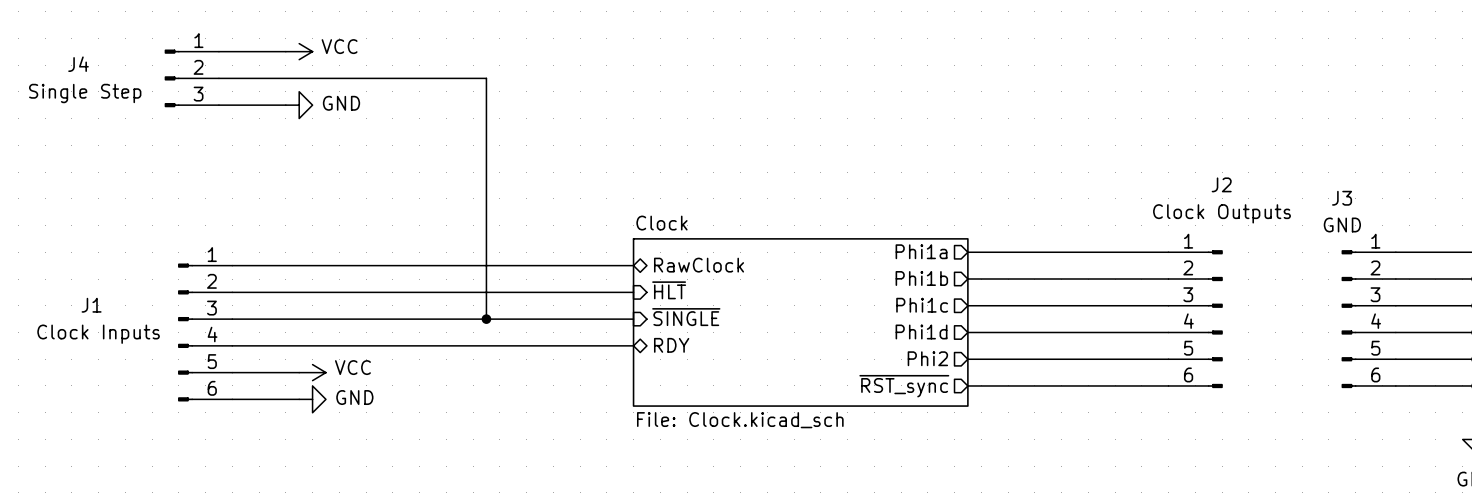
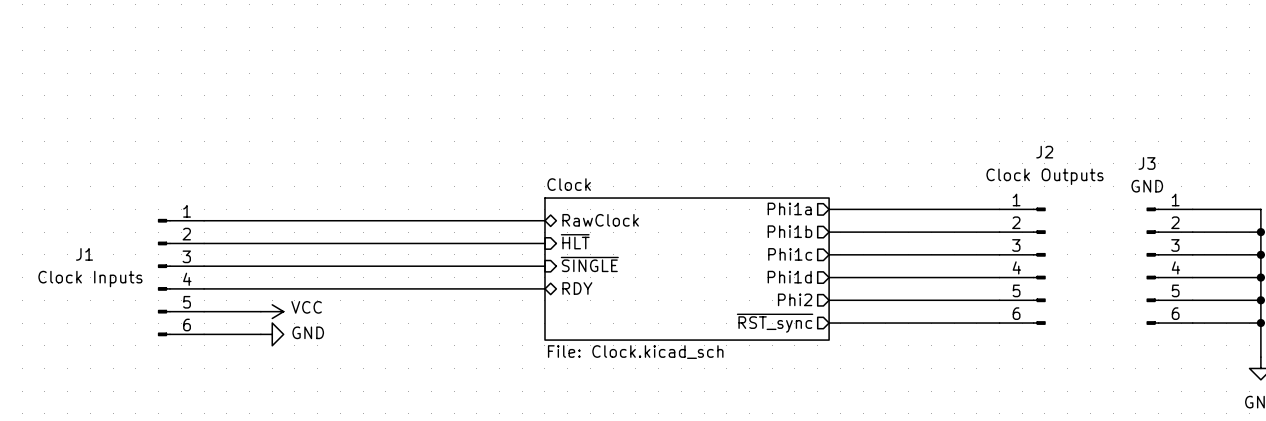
wire: (218, 51) (285, 51) -> none
power symbol: VCC (299, 51) -> none
J4: Single Step (191, 78) -> none
wire: (218, 78) (486, 78) (486, 319) -> none
wire: (218, 105) (285, 105) -> none
power symbol: GND (299, 105) -> none
junction: (486, 319) -> none

